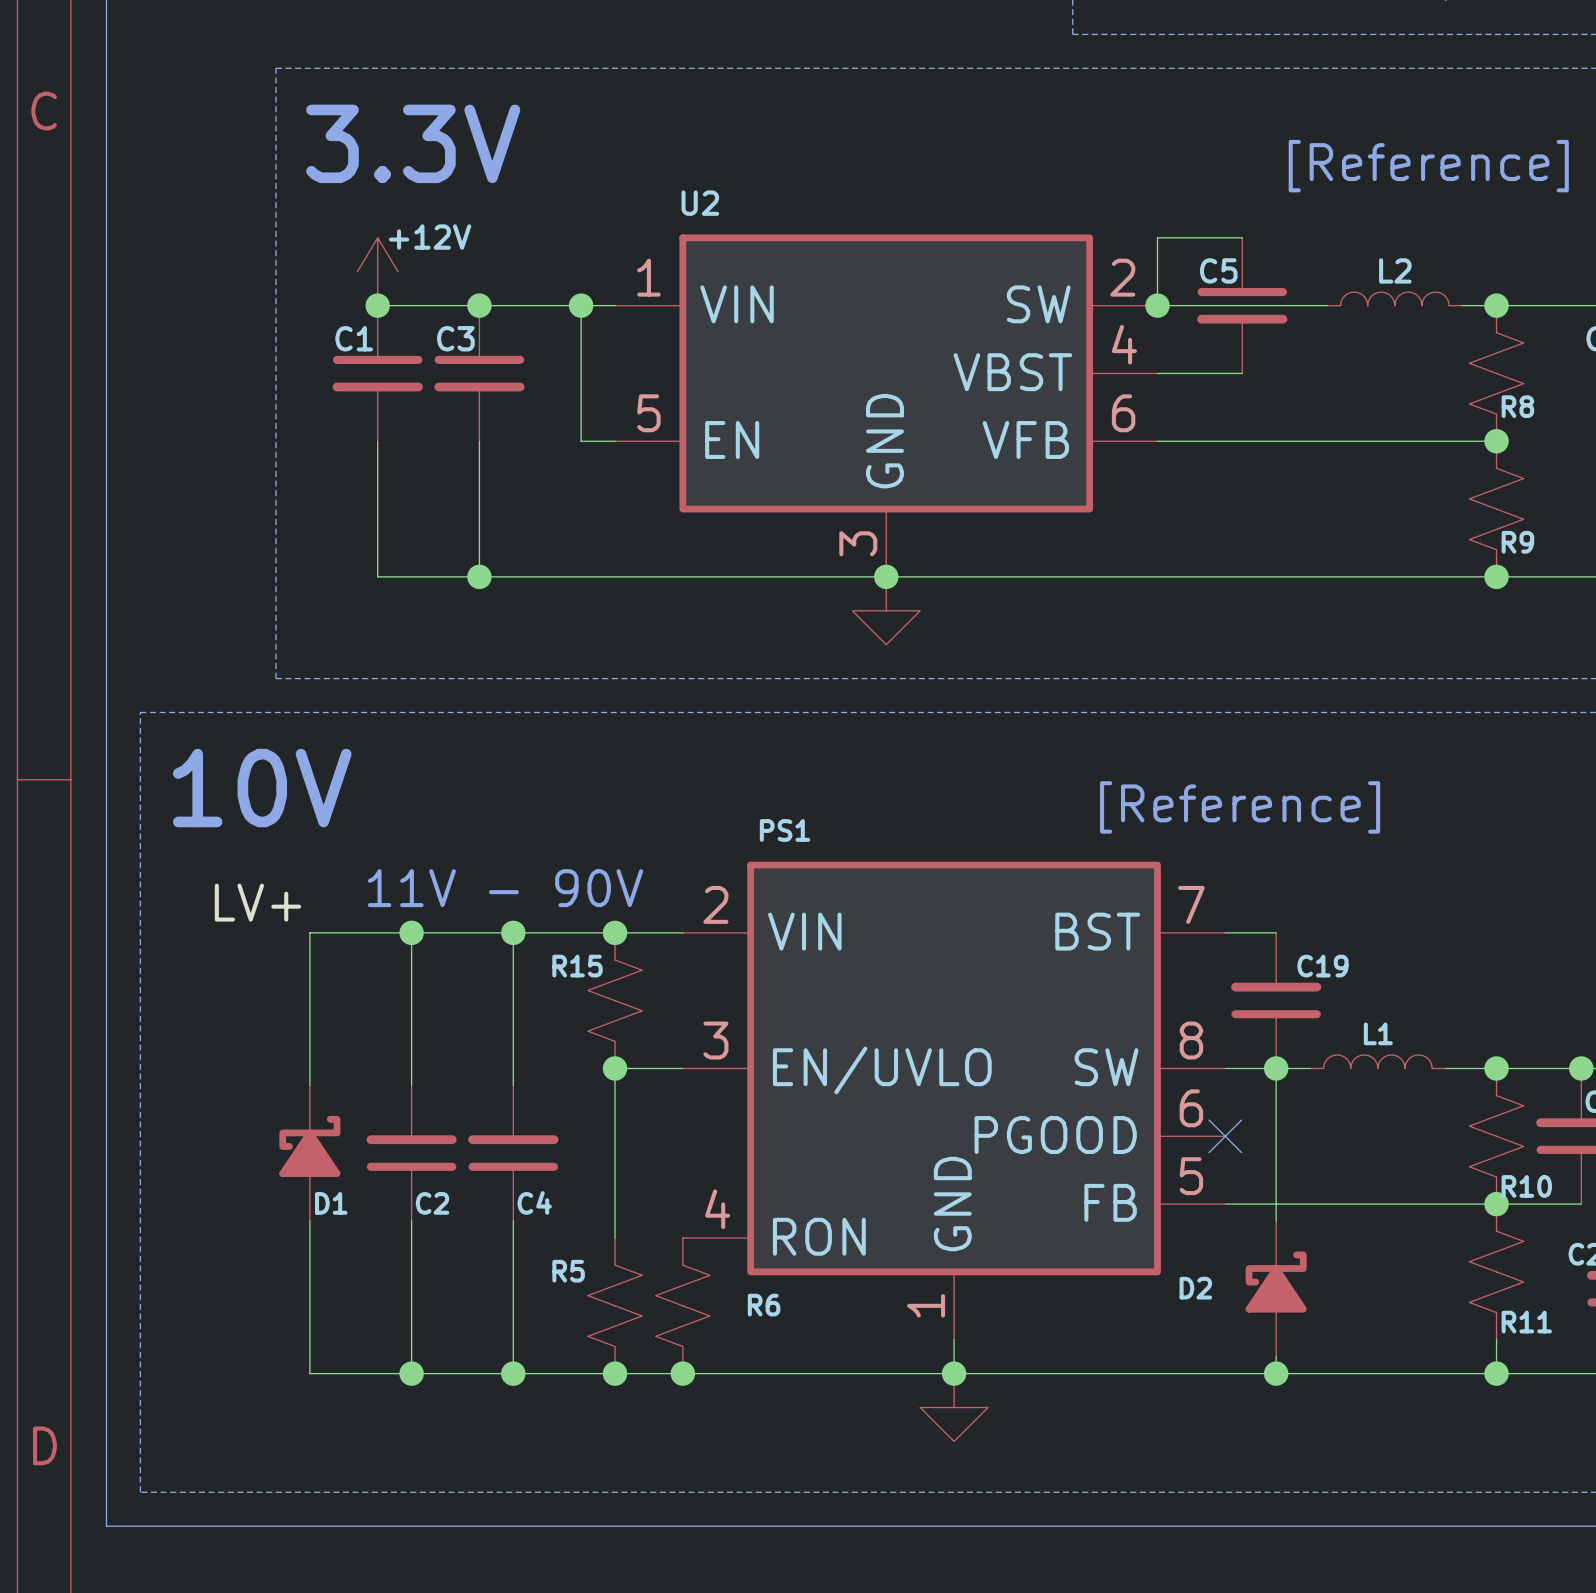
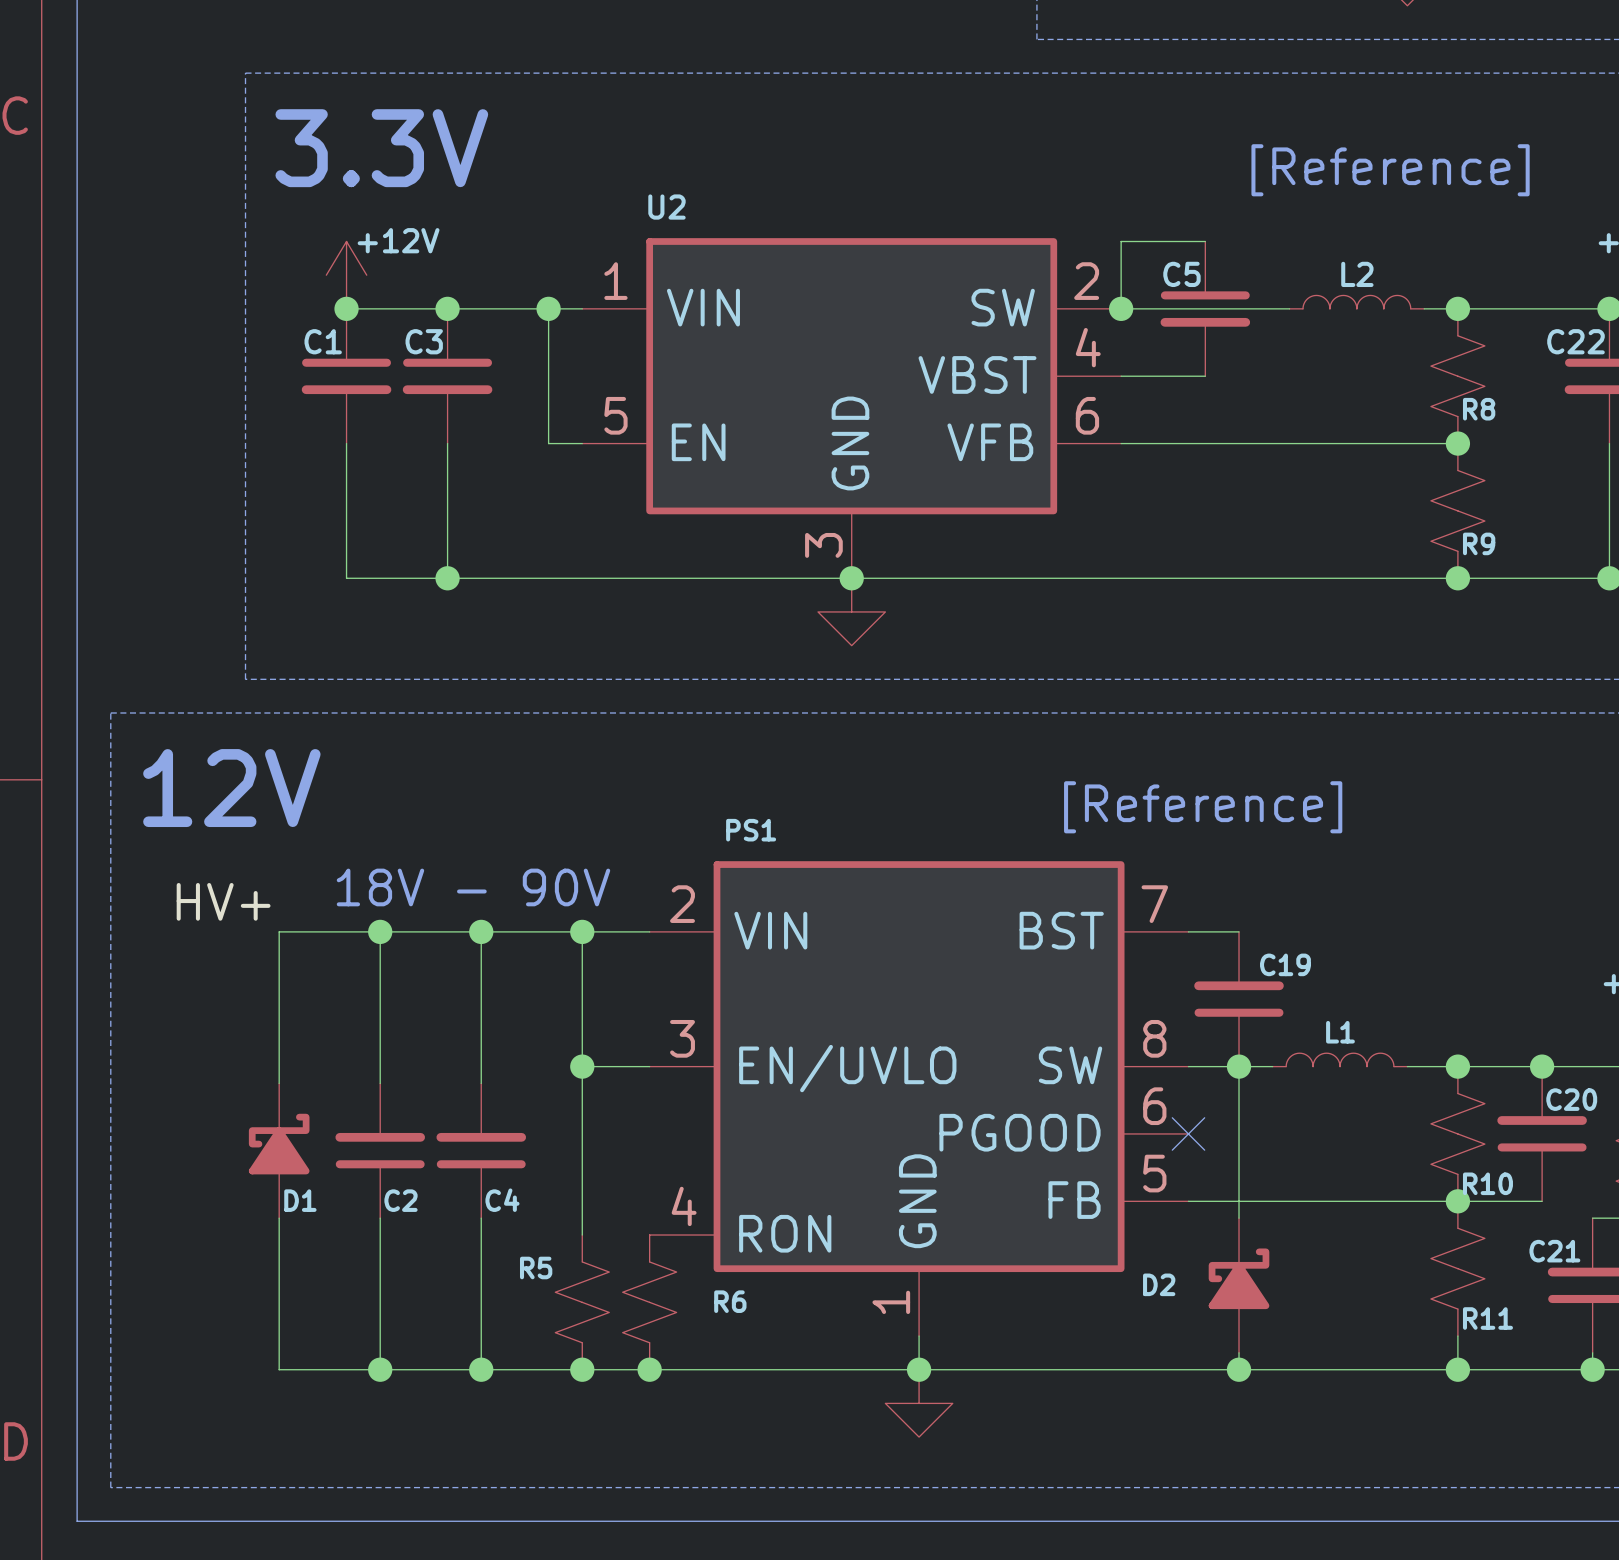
text: 10V (262, 788) -> 12V (231, 788)
text: 11V - 90V (505, 888) -> 18V - 90V (473, 887)
label: LV+ (257, 902) -> HV+ (223, 901)
wire: none -> (582, 931) (582, 1066)
R15: (615, 1000) -> none

